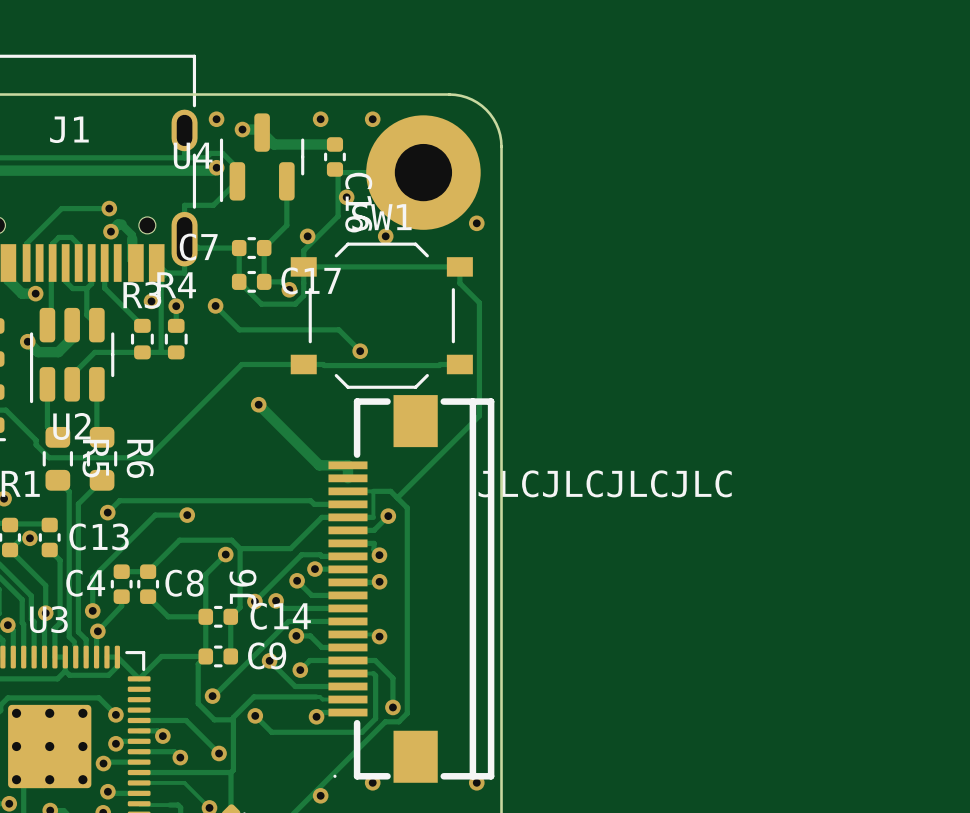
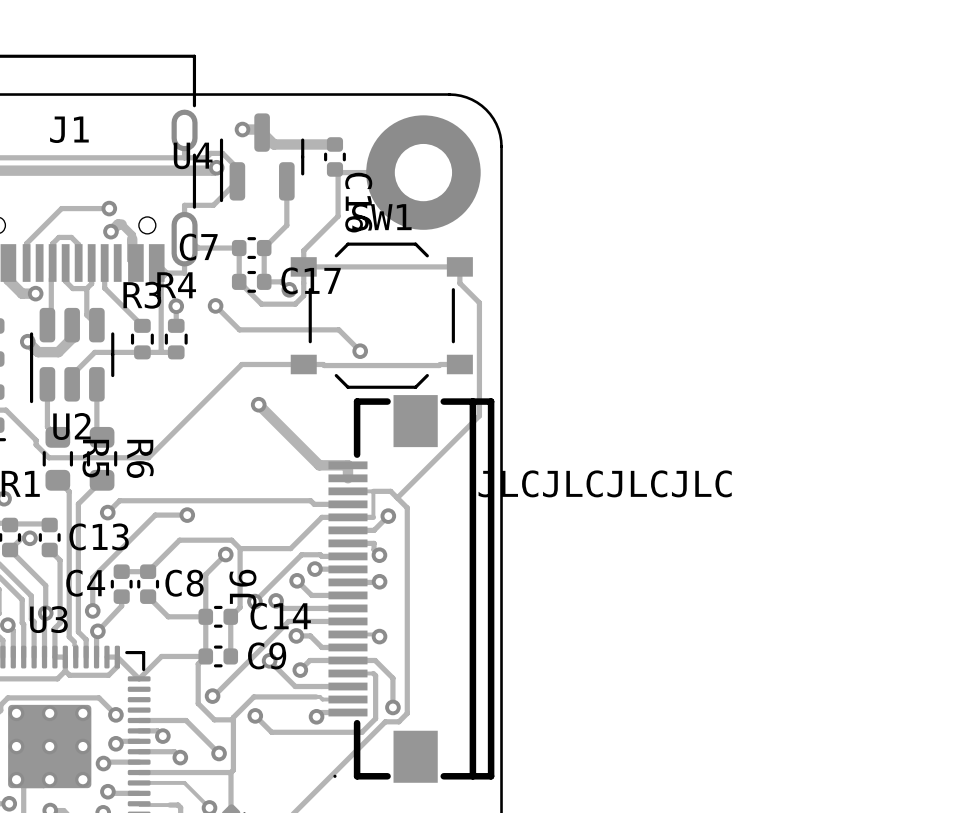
via: (216, 119) -> none
via: (320, 119) -> none
via: (372, 119) -> none
via: (346, 197) -> none
via: (476, 223) -> none
via: (307, 236) -> none
via: (385, 236) -> none
via: (151, 301) -> none
via: (372, 782) -> none
via: (476, 782) -> none
via: (320, 795) -> none

